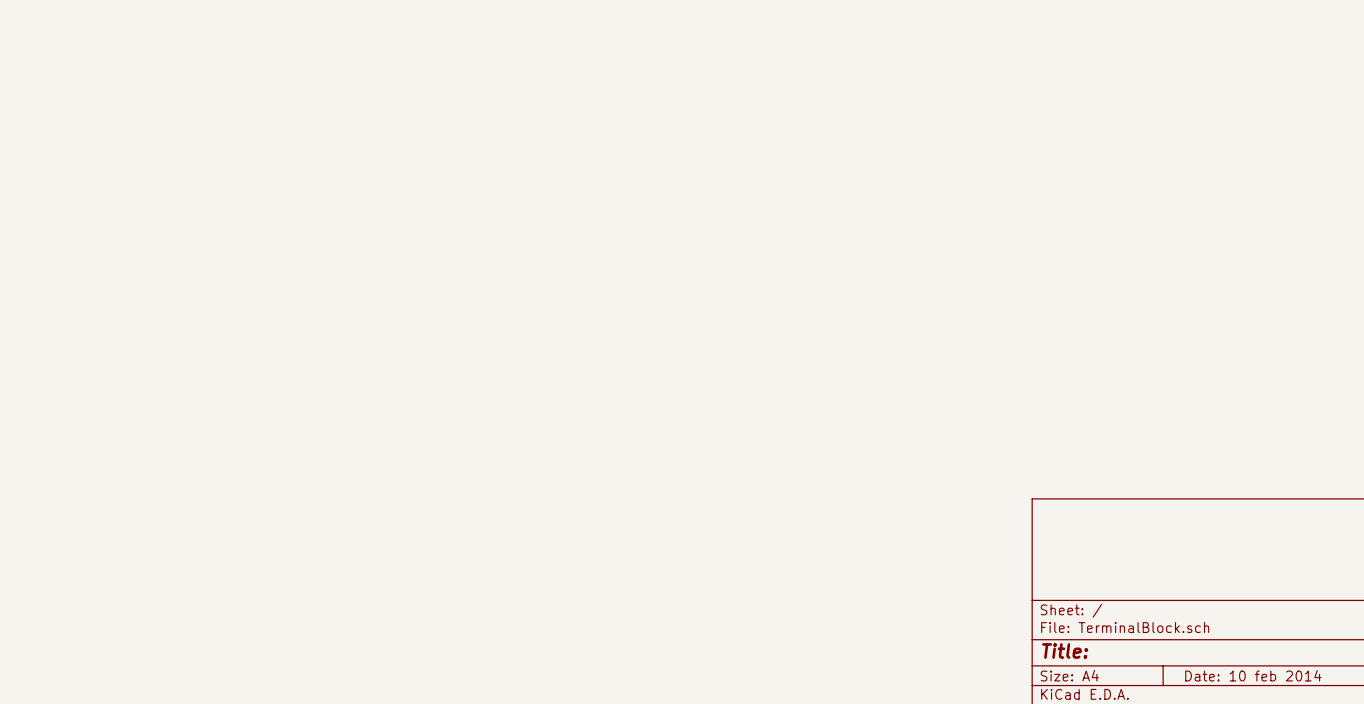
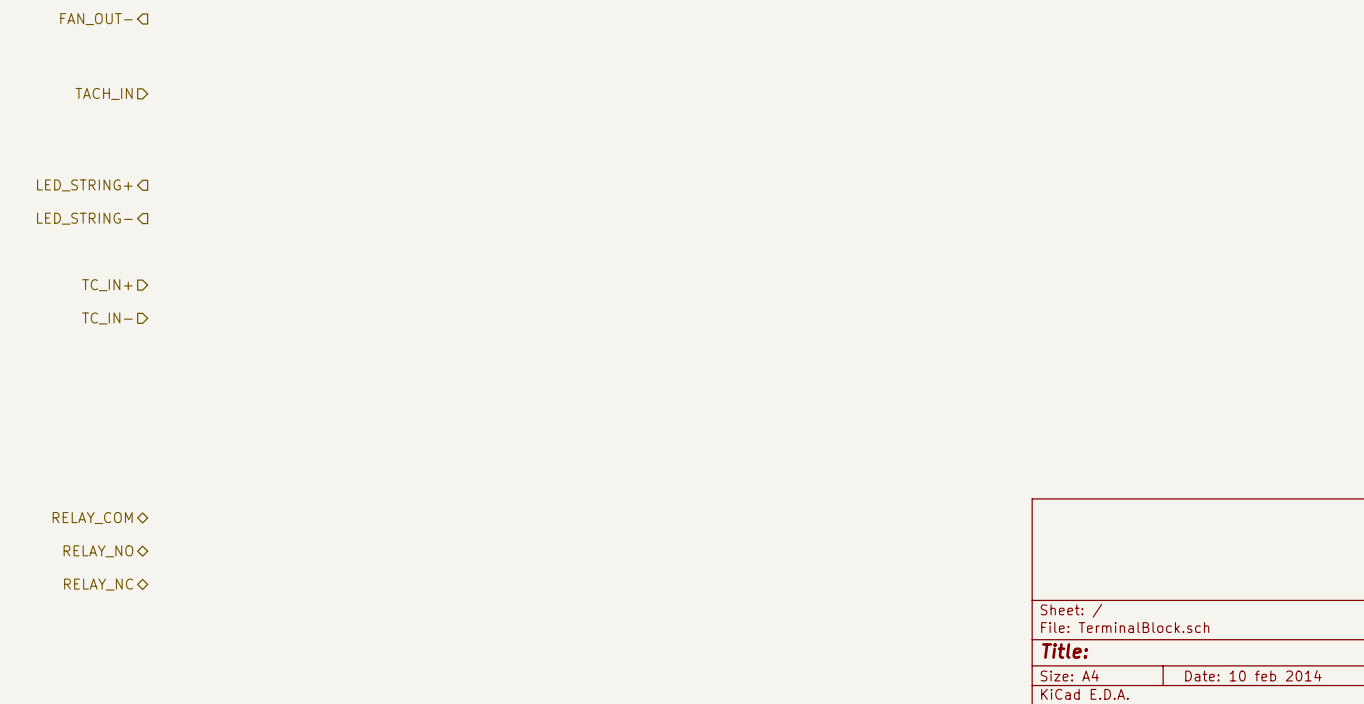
hierarchical label: none -> FAN_OUT- (96, 19)
hierarchical label: none -> TACH_IN (104, 93)
hierarchical label: none -> LED_STRING+ (84, 185)
hierarchical label: none -> LED_STRING- (84, 218)
hierarchical label: none -> TC_IN+ (107, 285)
hierarchical label: none -> TC_IN- (107, 318)
hierarchical label: none -> RELAY_COM (92, 518)
hierarchical label: none -> RELAY_NO (98, 551)
hierarchical label: none -> RELAY_NC (98, 584)

